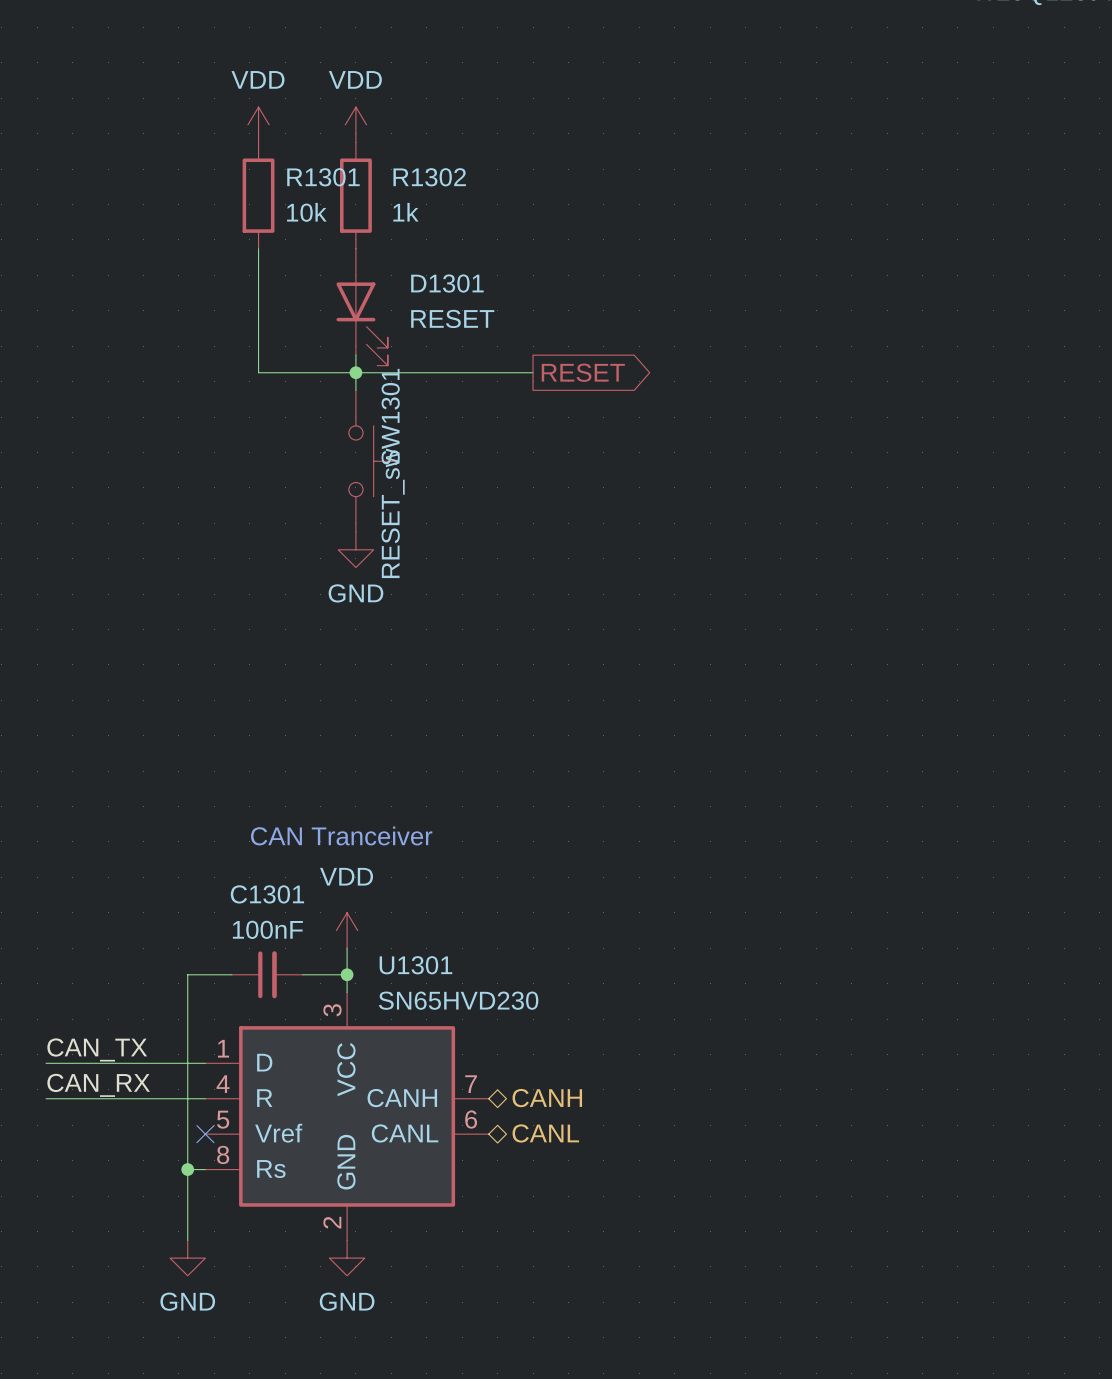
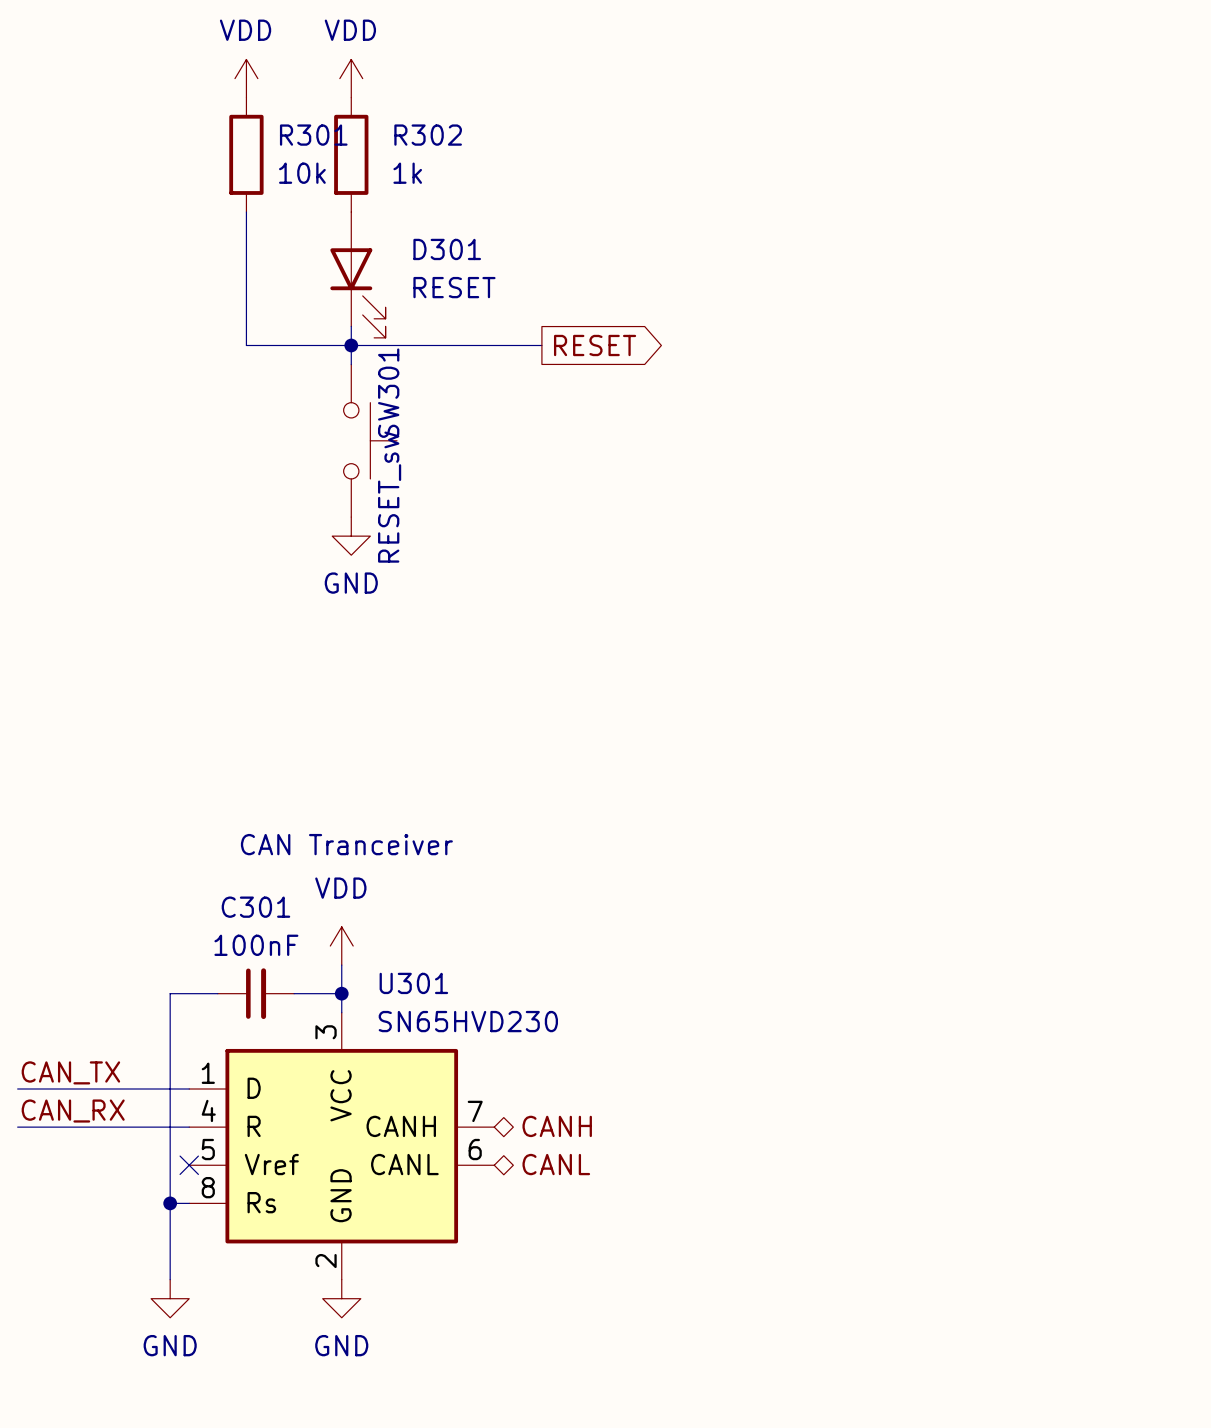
R1301 name: R1301 (323, 177) -> R301 (313, 135)
R1302 name: R1302 (429, 177) -> R302 (428, 135)
D1301 name: D1301 (447, 283) -> D301 (447, 249)
SW1301 name: SW1301 (390, 417) -> SW301 (388, 393)
C1301 name: C1301 (267, 894) -> C301 (255, 907)
U1301 name: U1301 (415, 965) -> U301 (413, 983)

